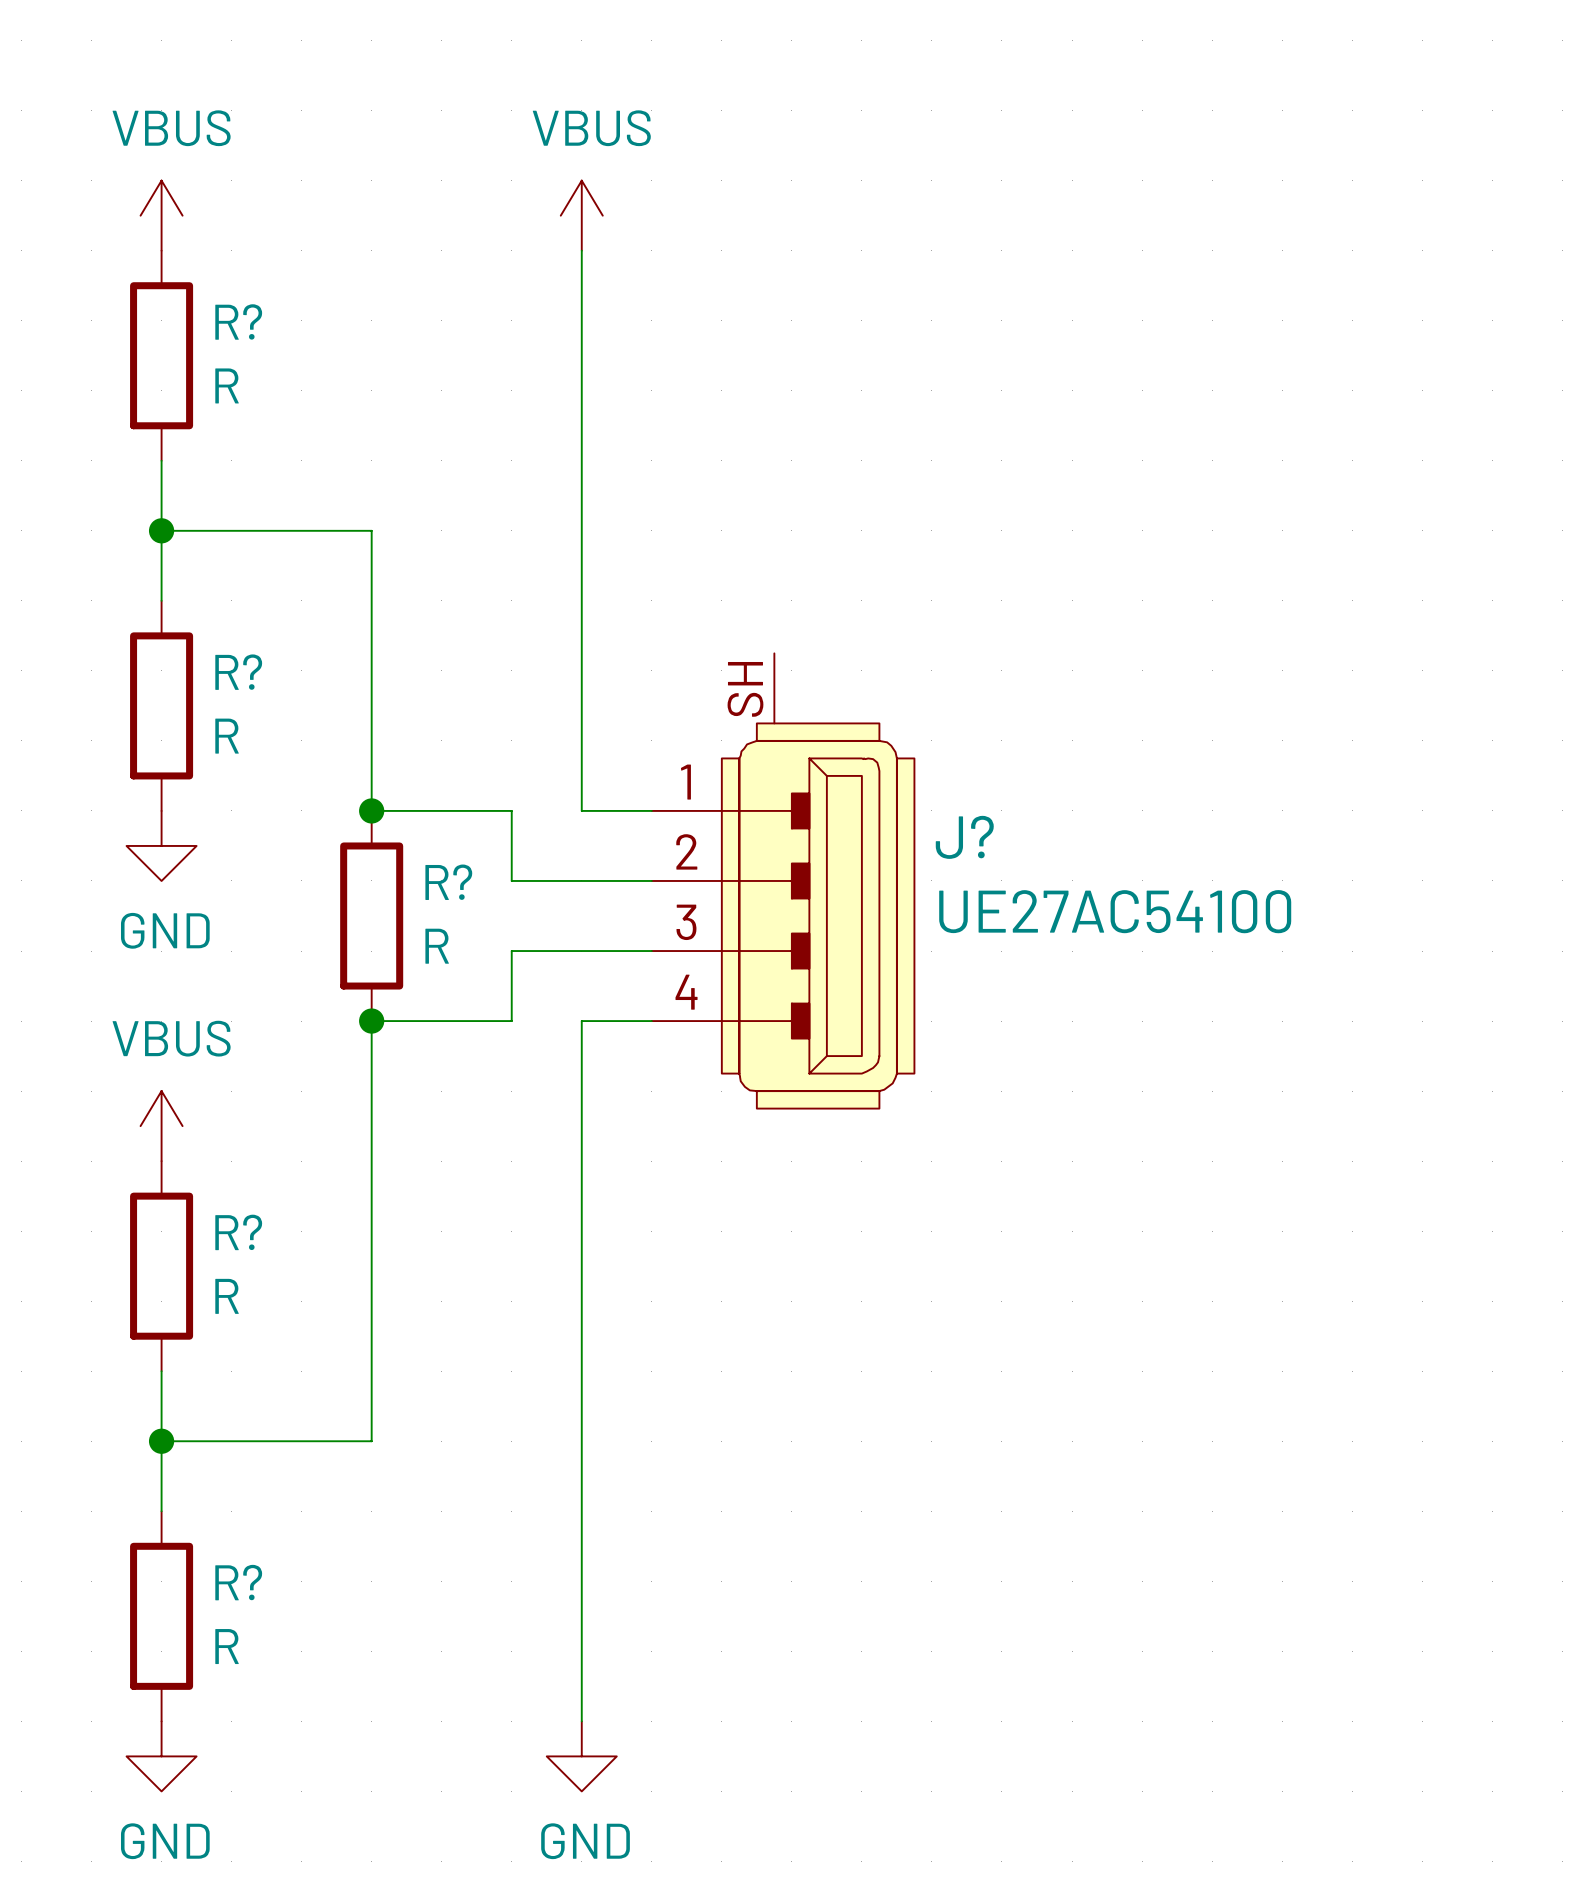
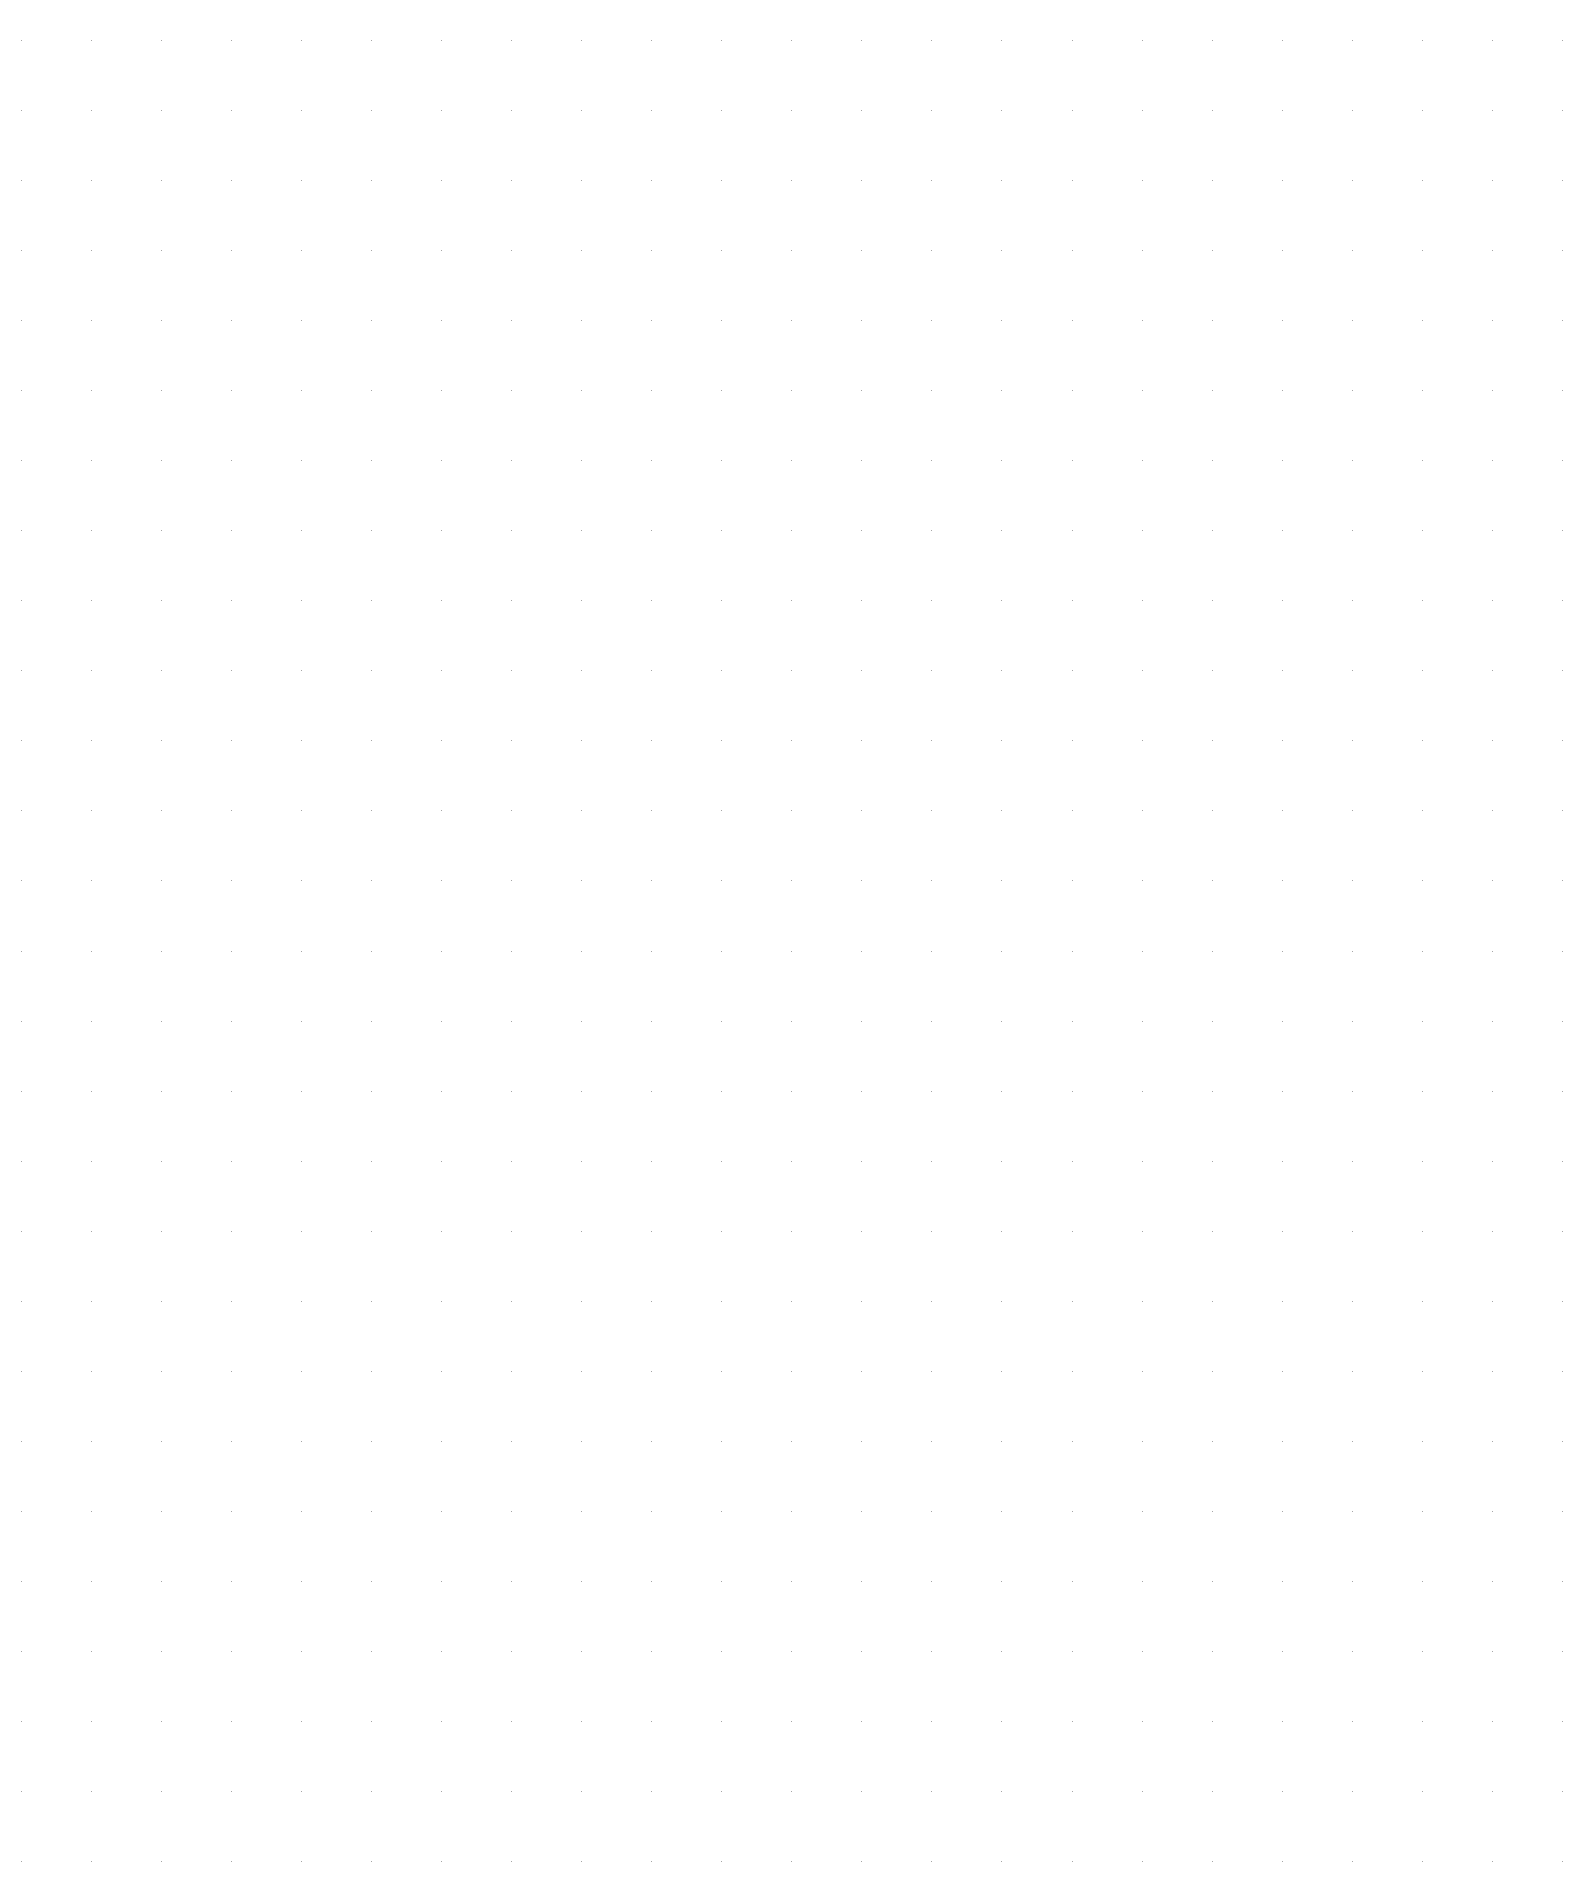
power symbol: VBUS (161, 215) -> none
power symbol: VBUS (581, 215) -> none
wire: (581, 250) (581, 810) (651, 810) -> none
R?: R (161, 355) -> none
wire: (161, 460) (161, 600) -> none
wire: (161, 530) (371, 530) (371, 810) (511, 810) (511, 880) (651, 880) -> none
junction: (161, 530) -> none
R?: R (161, 705) -> none
junction: (371, 810) -> none
power symbol: GND (161, 845) -> none
J?: UE27AC54100 (783, 880) -> none
R?: R (371, 916) -> none
wire: (651, 951) (511, 951) (511, 1021) (371, 1021) (371, 1441) (161, 1441) -> none
junction: (371, 1021) -> none
wire: (651, 1021) (581, 1021) (581, 1721) -> none
power symbol: VBUS (161, 1126) -> none
R?: R (161, 1266) -> none
wire: (161, 1371) (161, 1511) -> none
junction: (161, 1441) -> none
R?: R (161, 1616) -> none
power symbol: GND (161, 1756) -> none
power symbol: GND (581, 1756) -> none

